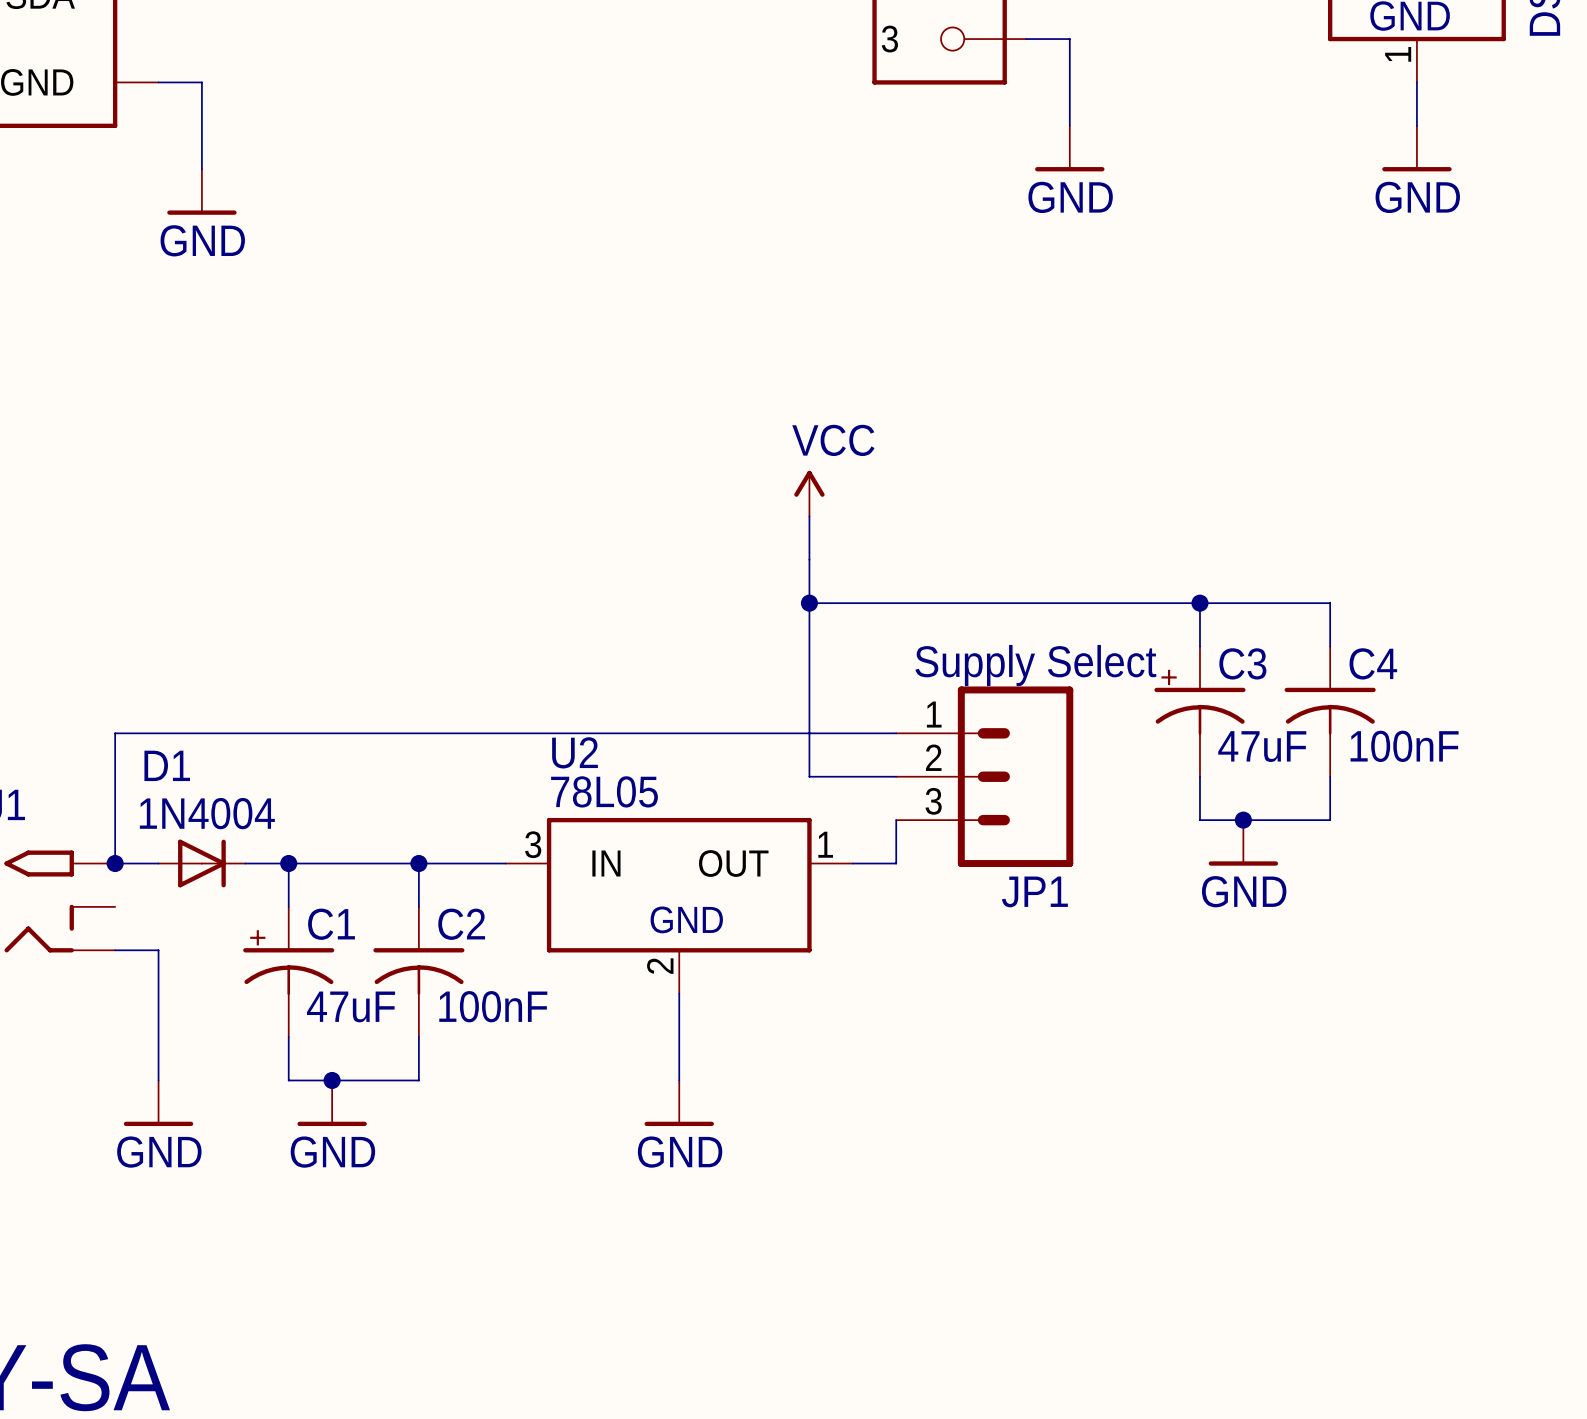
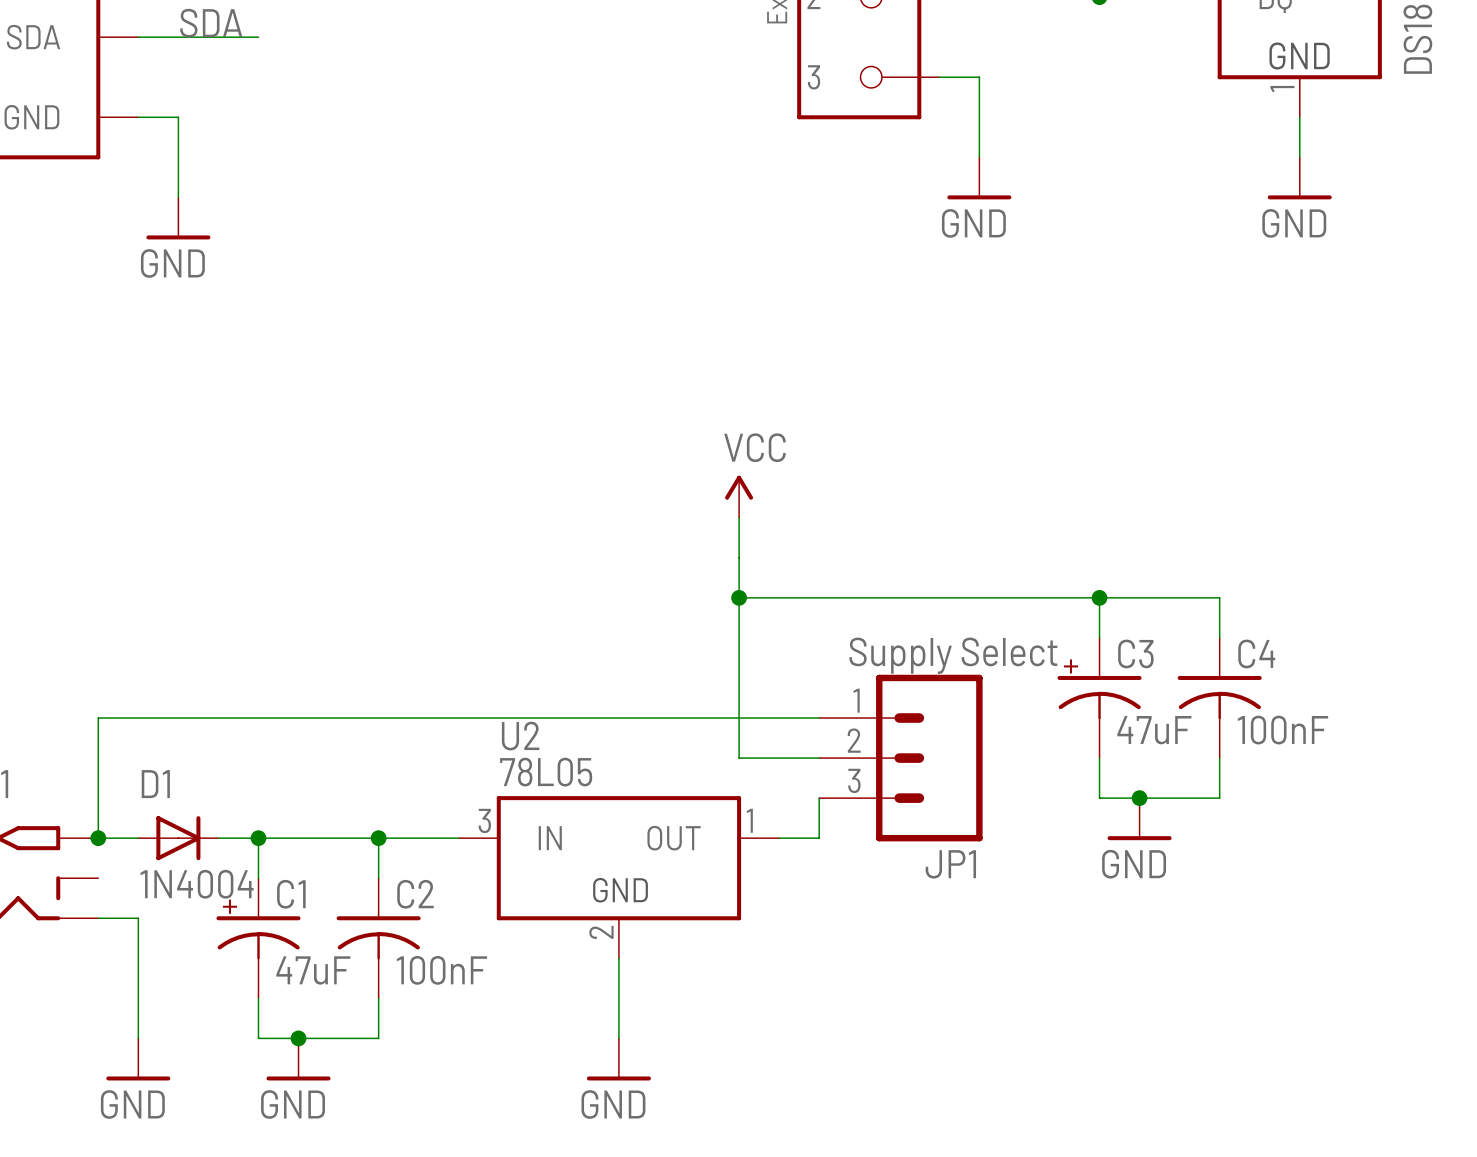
D1 name position: D1 (167, 765) -> D1 (155, 784)
D1 value position: 1N4004 (207, 813) -> 1N4004 (197, 884)

